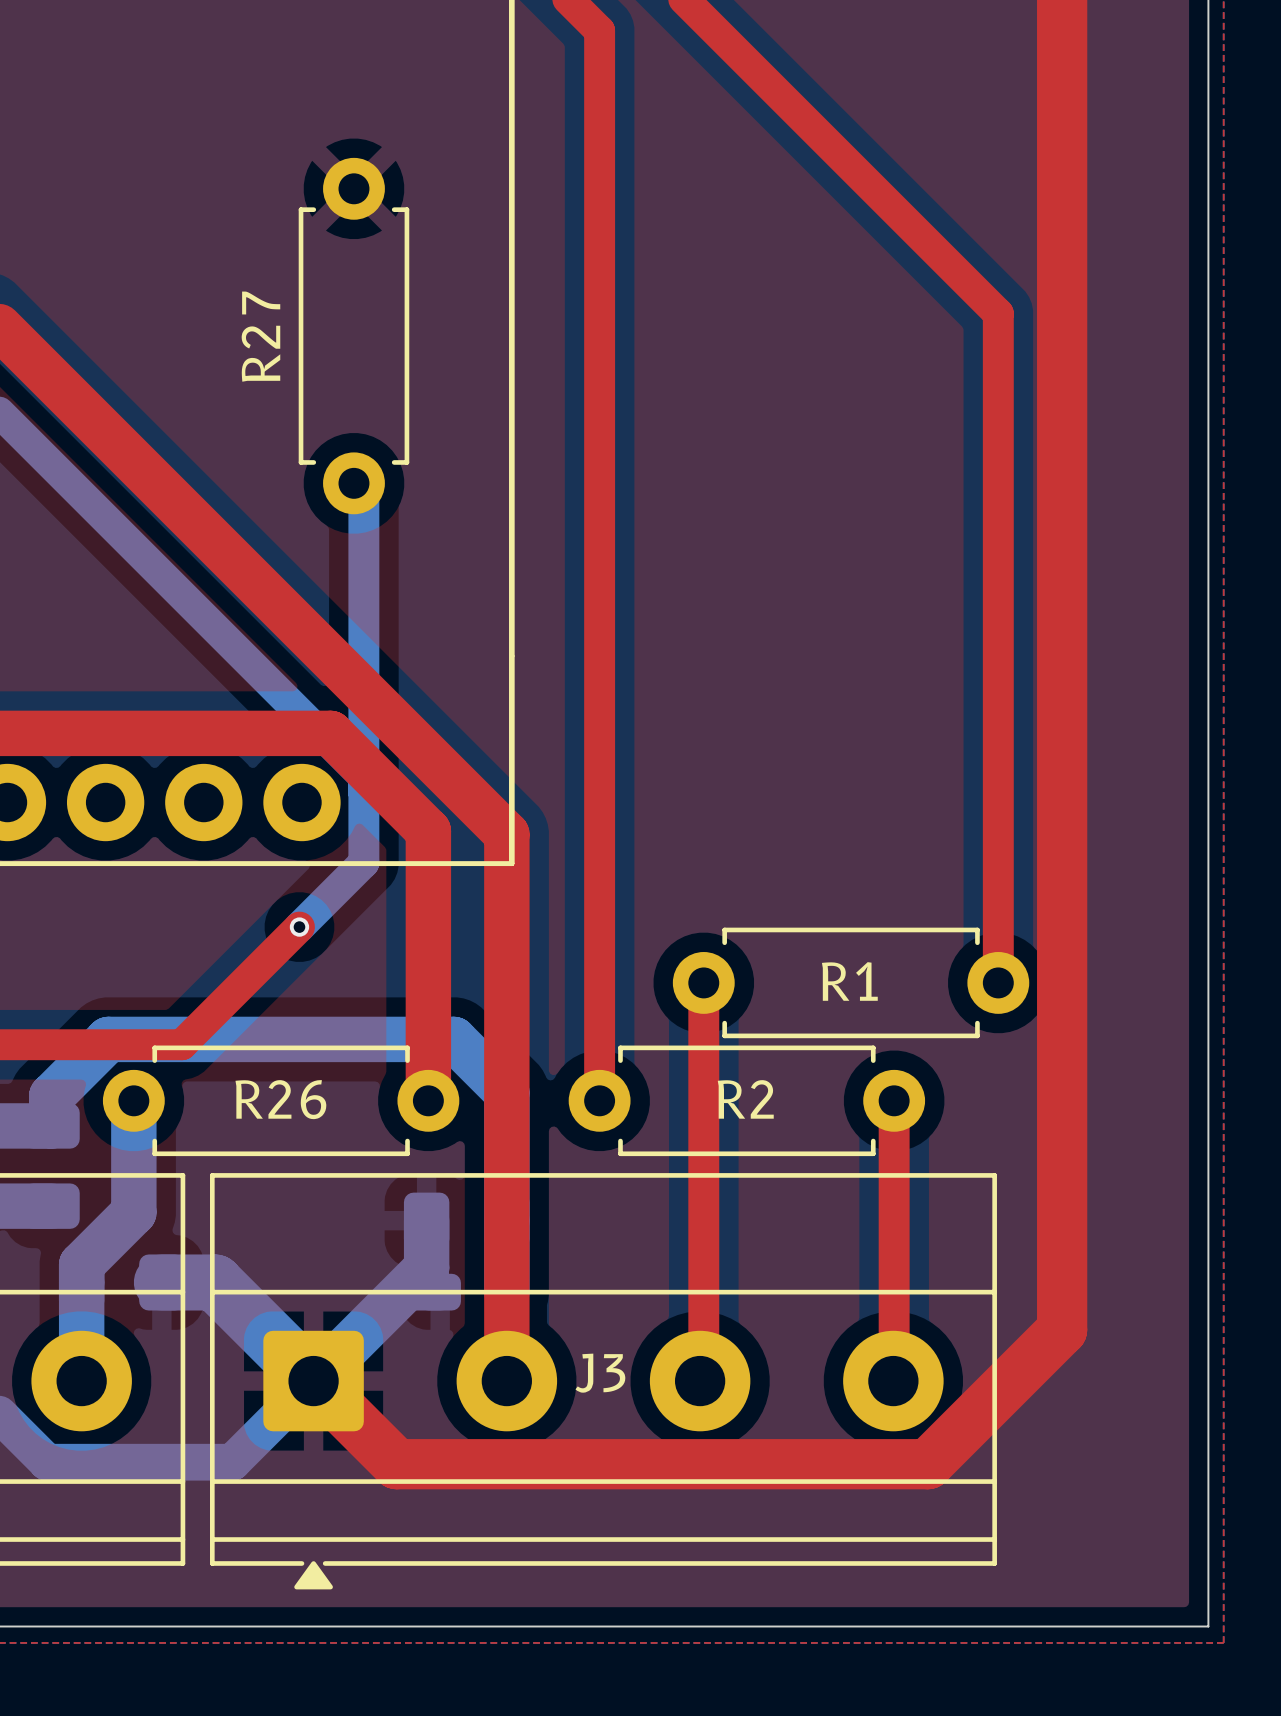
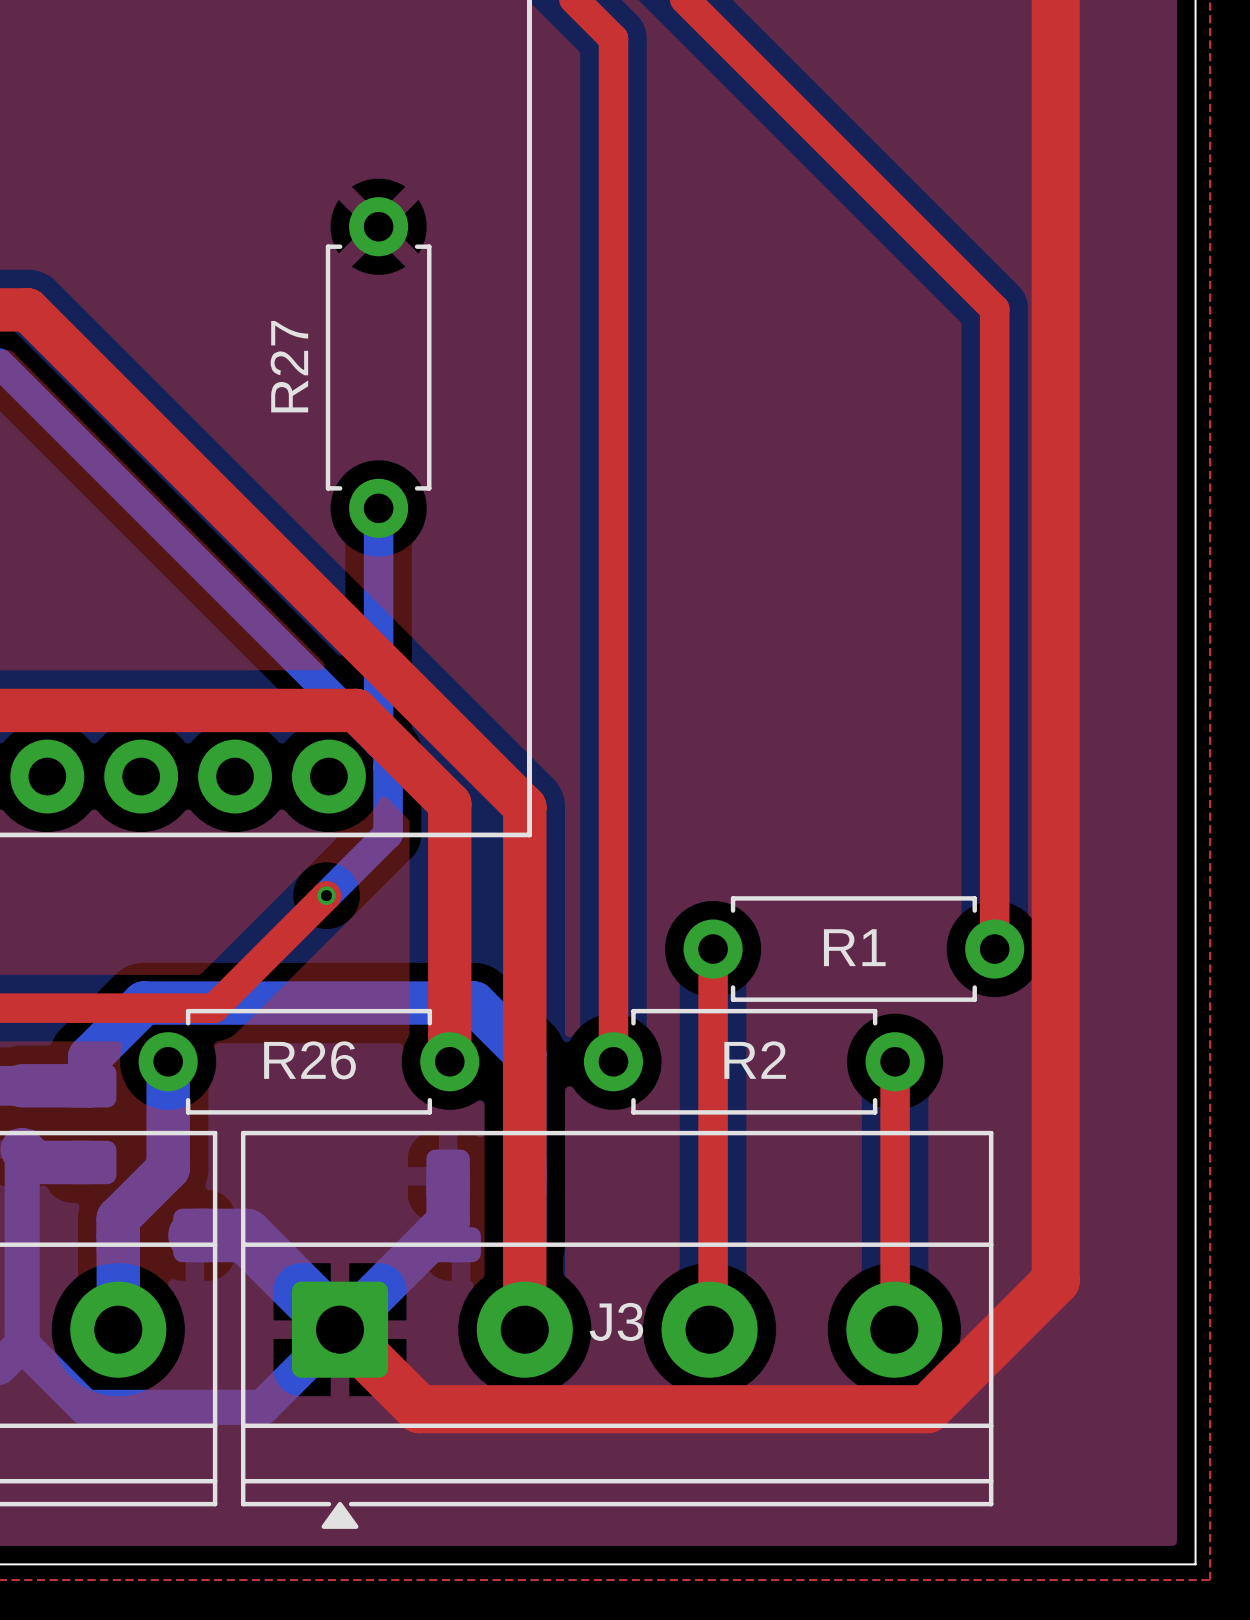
R27 position: (353, 336) -> (378, 367)
bottom track: (353, 483) (363, 493) (363, 776) -> none
bottom track: none -> (378, 508) (378, 742)

